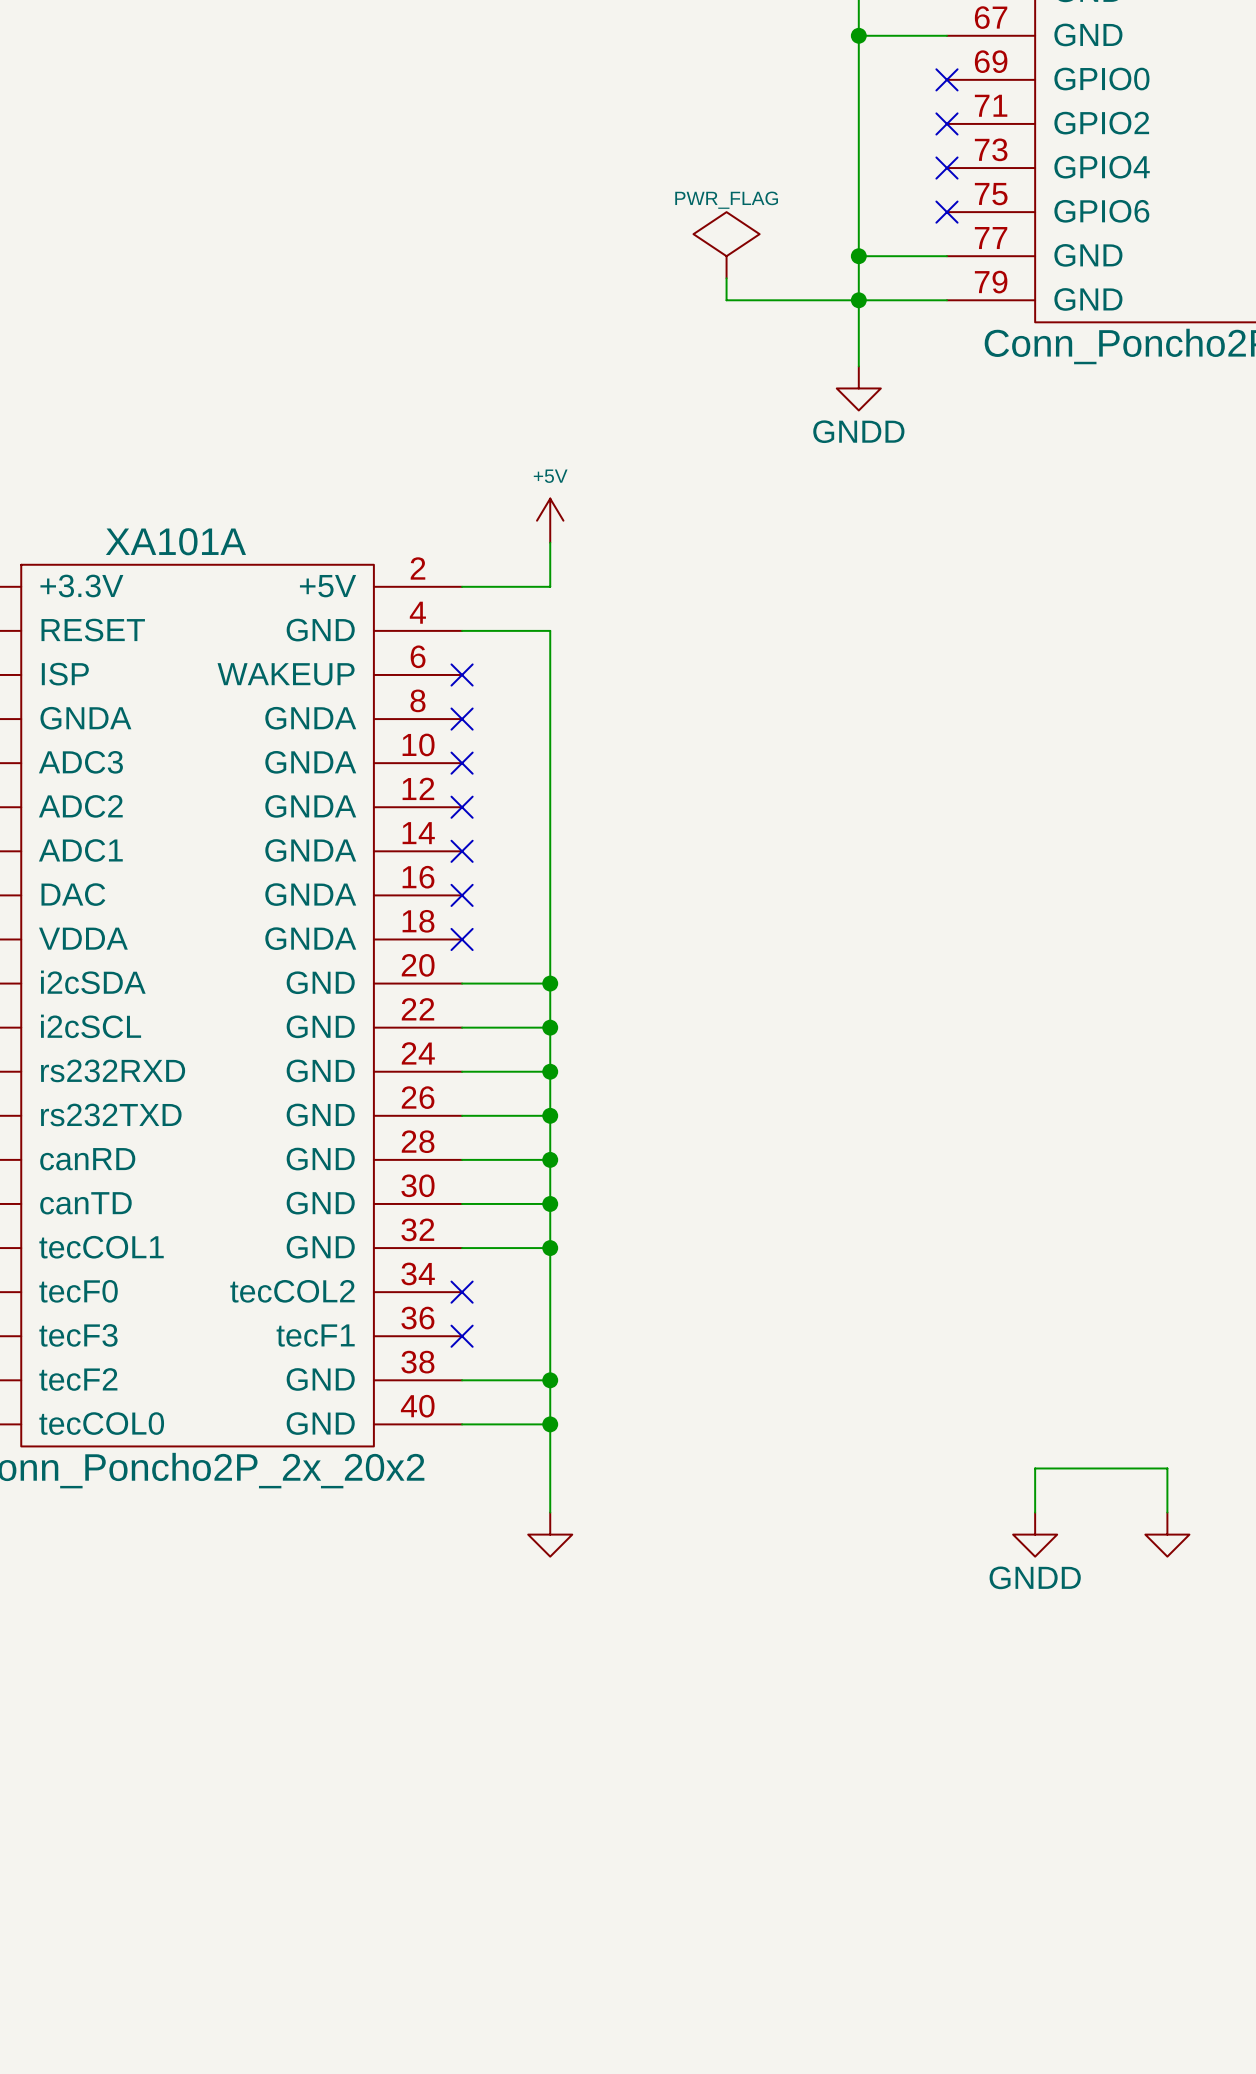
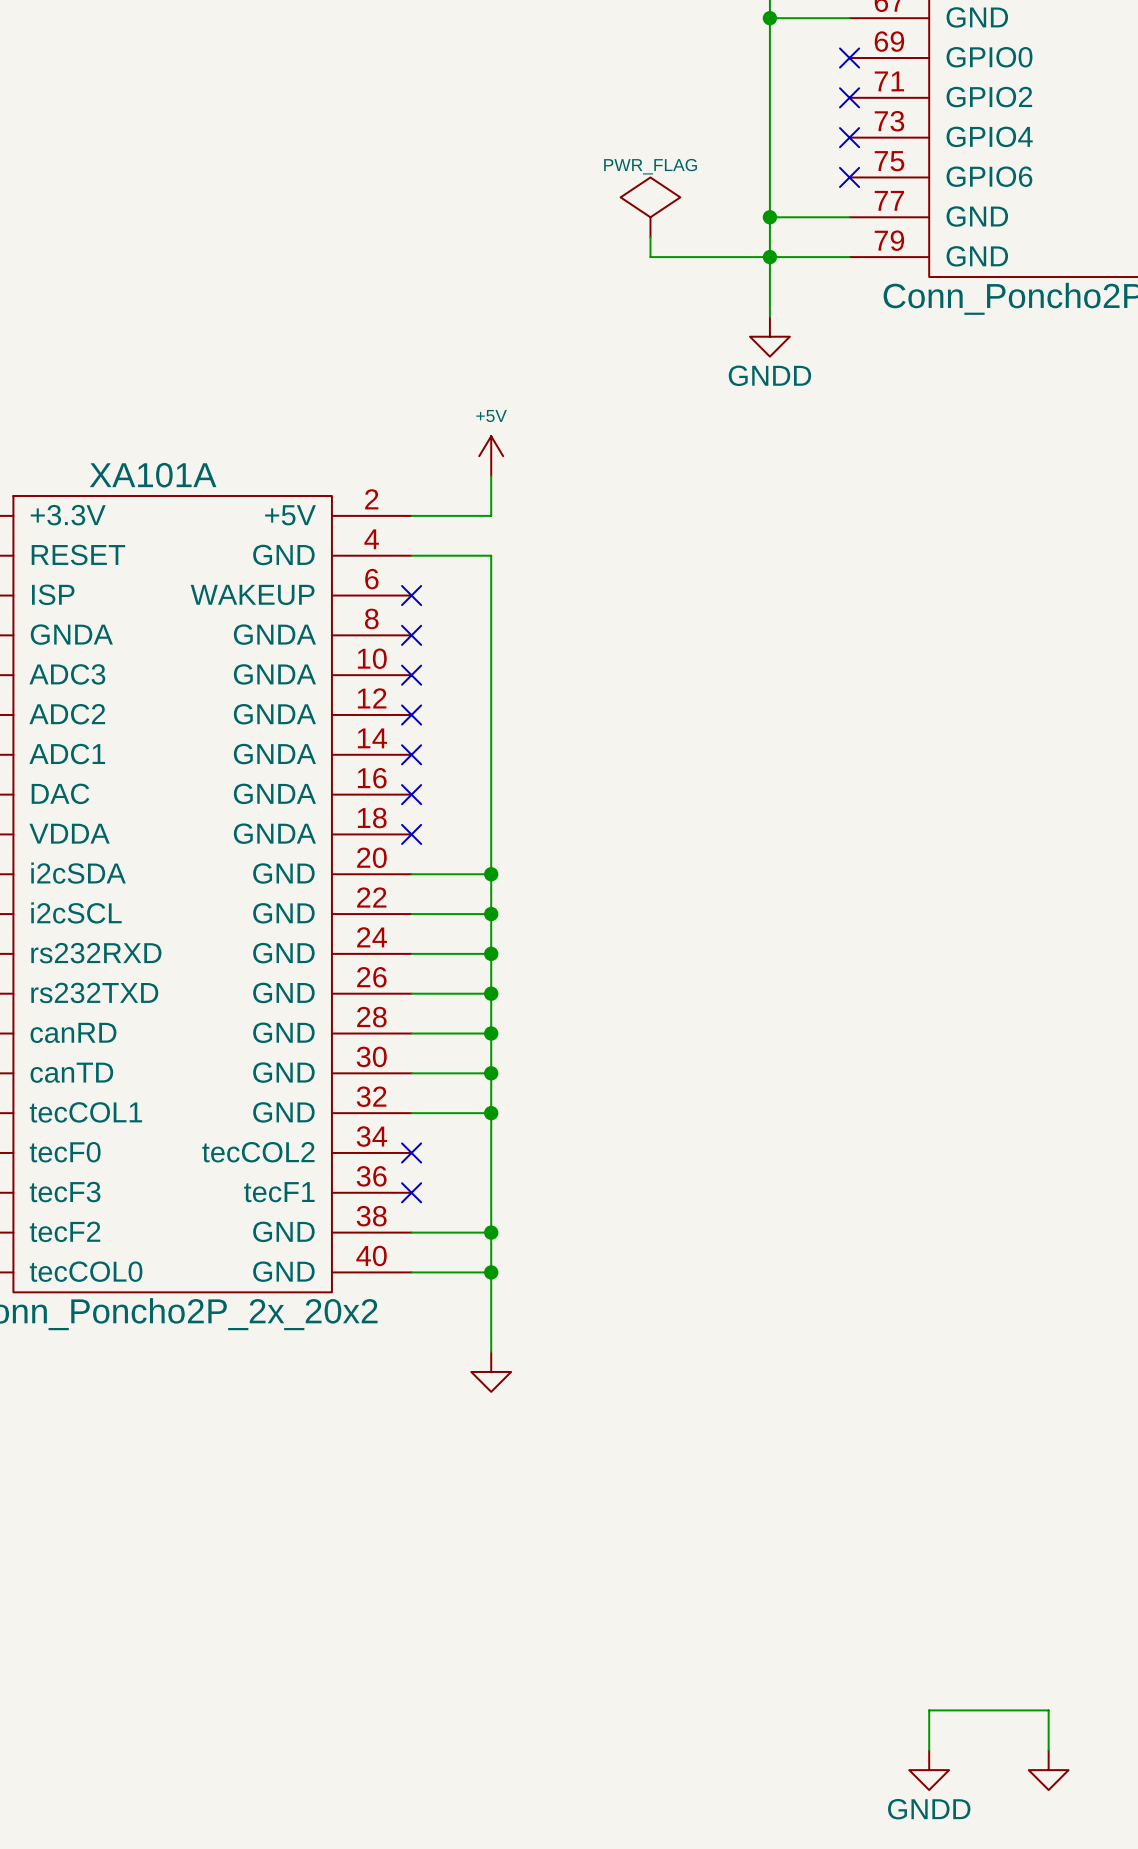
wire: (1035, 1512) (1035, 1468) (1167, 1468) (1167, 1512) -> none
power symbol: GNDD (1035, 1534) -> none
power symbol: (1167, 1534) -> none
wire: none -> (929, 1750) (929, 1710) (1048, 1710) (1048, 1750)
power symbol: none -> GNDD (929, 1770)
power symbol: none -> (1048, 1770)

